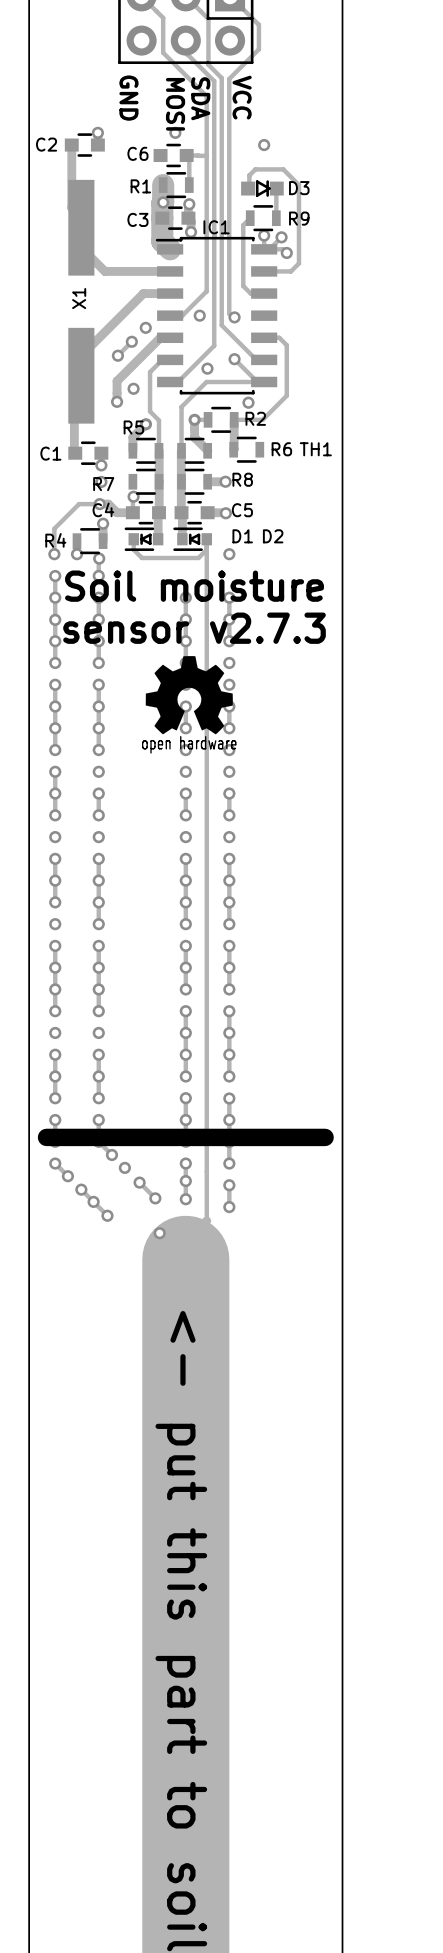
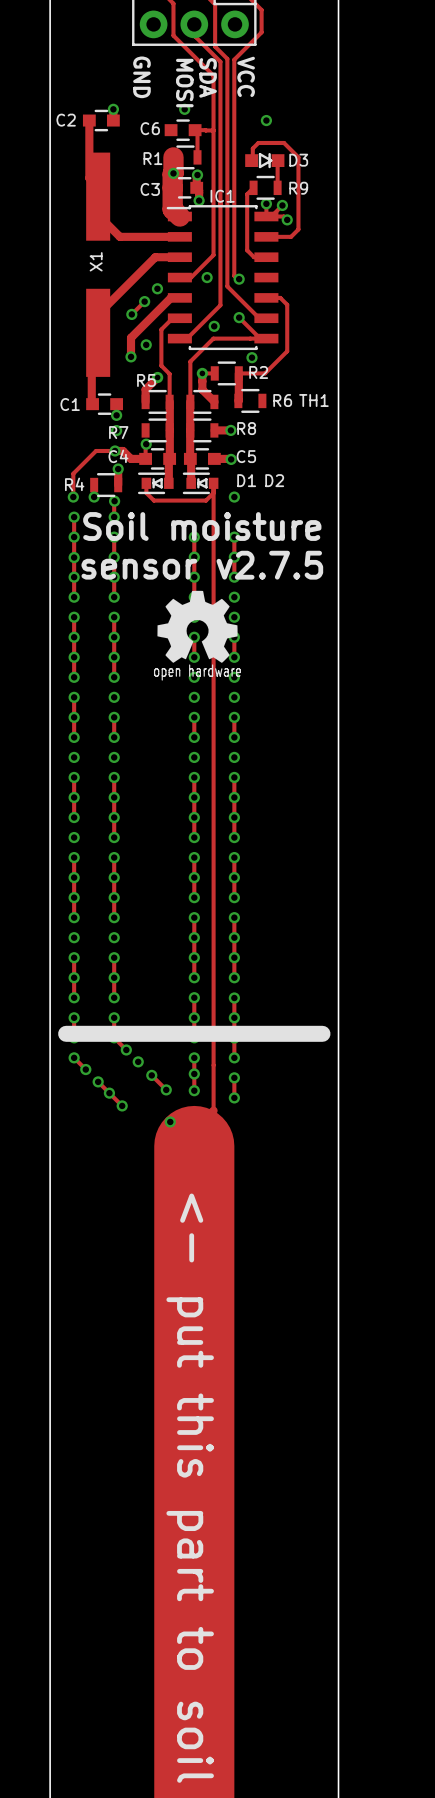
text: sensor v2.7.3 (194, 628) -> sensor v2.7.5 (202, 565)

